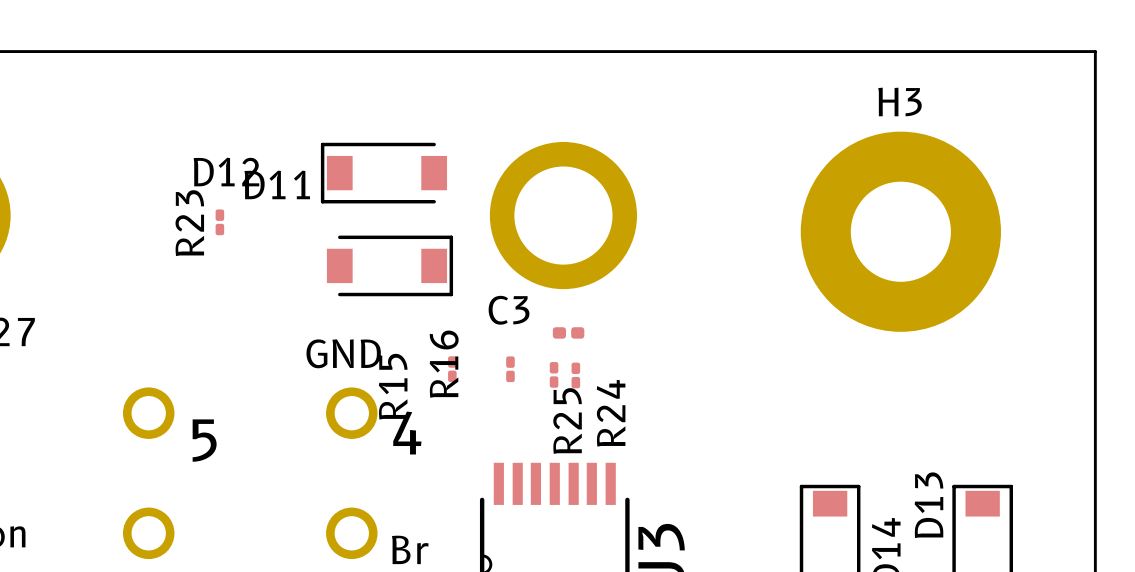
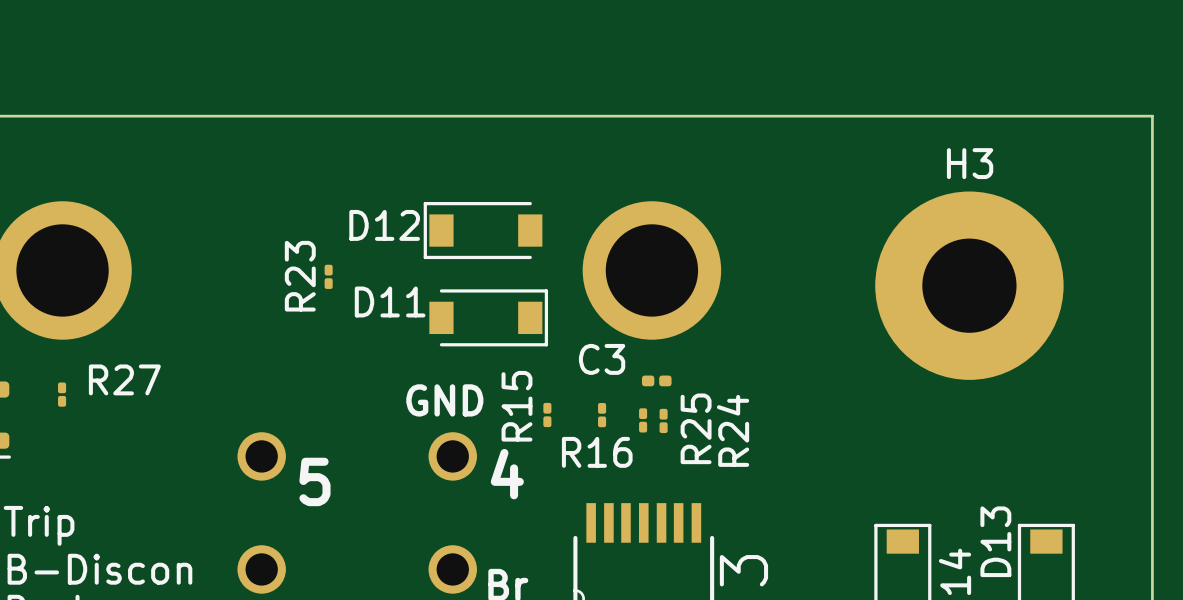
D12 name position: D12 (226, 172) -> D12 (384, 225)
D11 name position: D11 (277, 184) -> D11 (390, 301)
R16 name rotation: 0° (444, 364) -> 90° clockwise (597, 452)
R15 name position: R15 (393, 386) -> R15 (516, 406)
R24 name position: R24 (611, 413) -> R24 (733, 430)
R25 name position: R25 (567, 421) -> R25 (696, 428)

